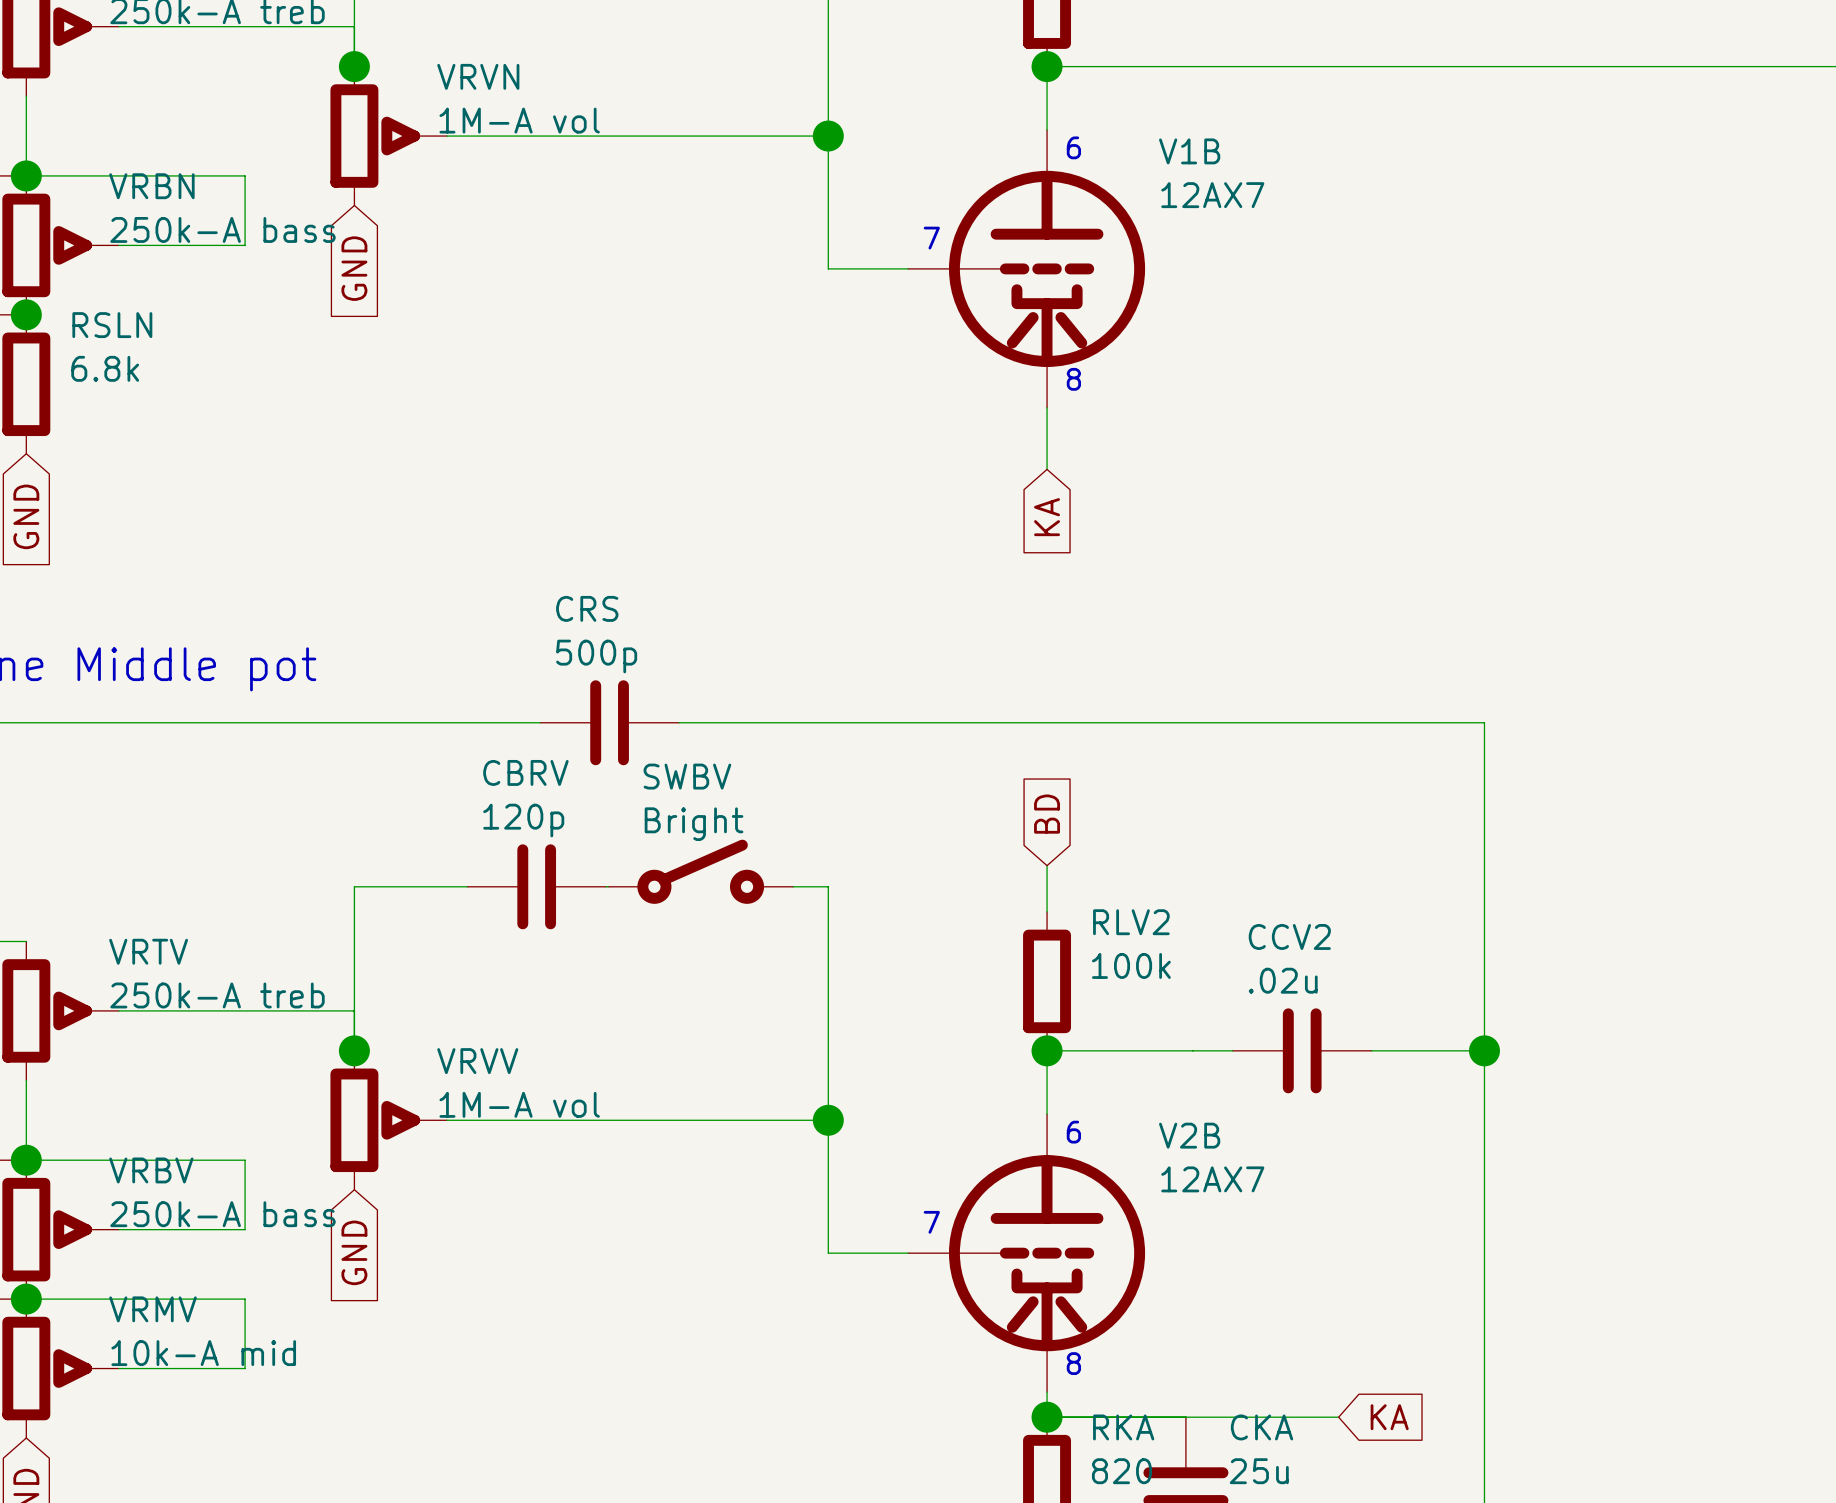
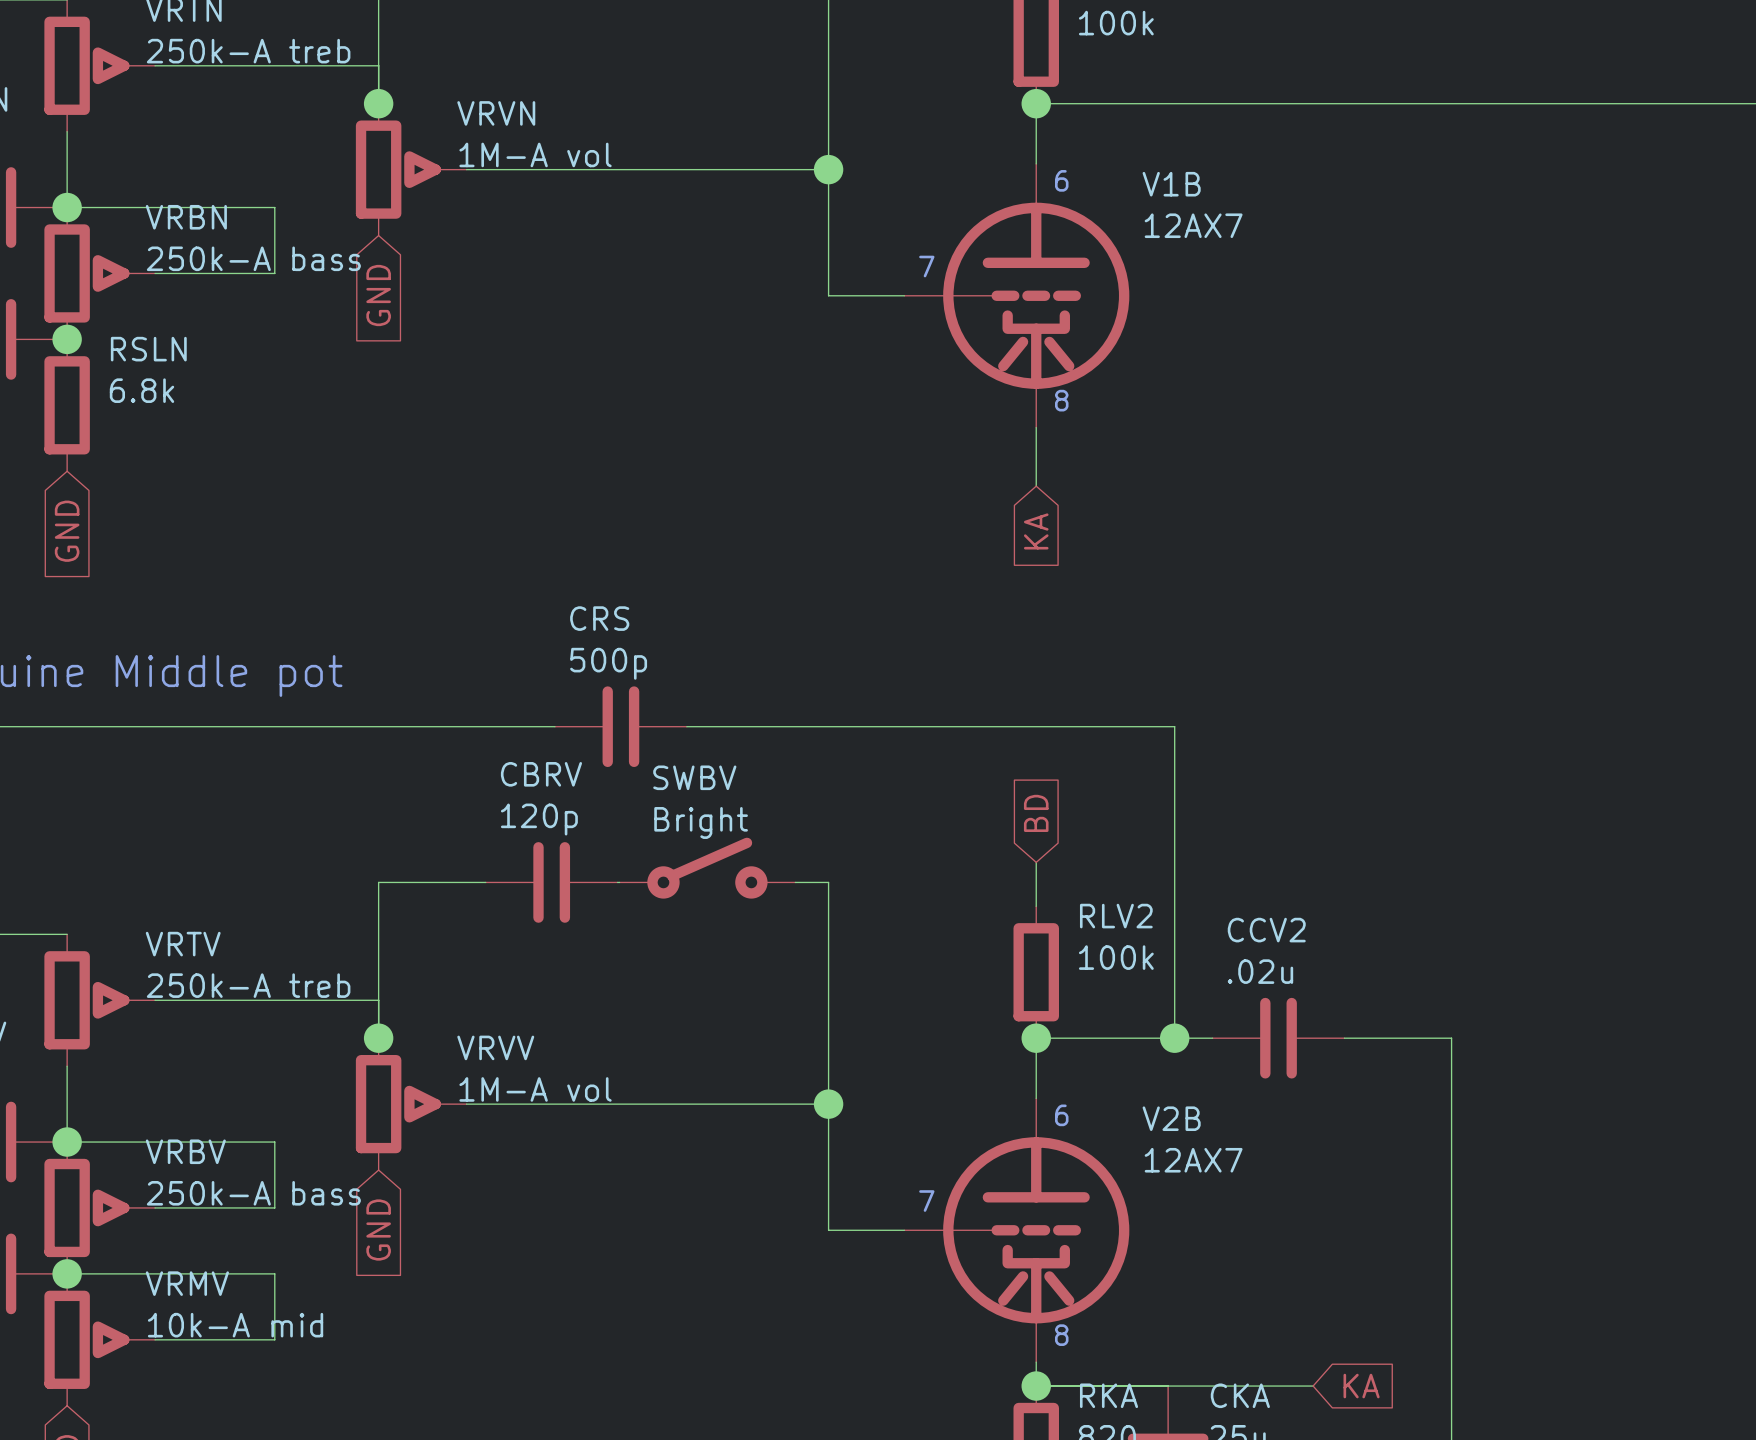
wire: (1192, 722) (1484, 722) (1484, 1050) -> (1174, 726) (1174, 1038)
junction: none -> (1174, 1038)
junction: (1484, 1050) -> none

